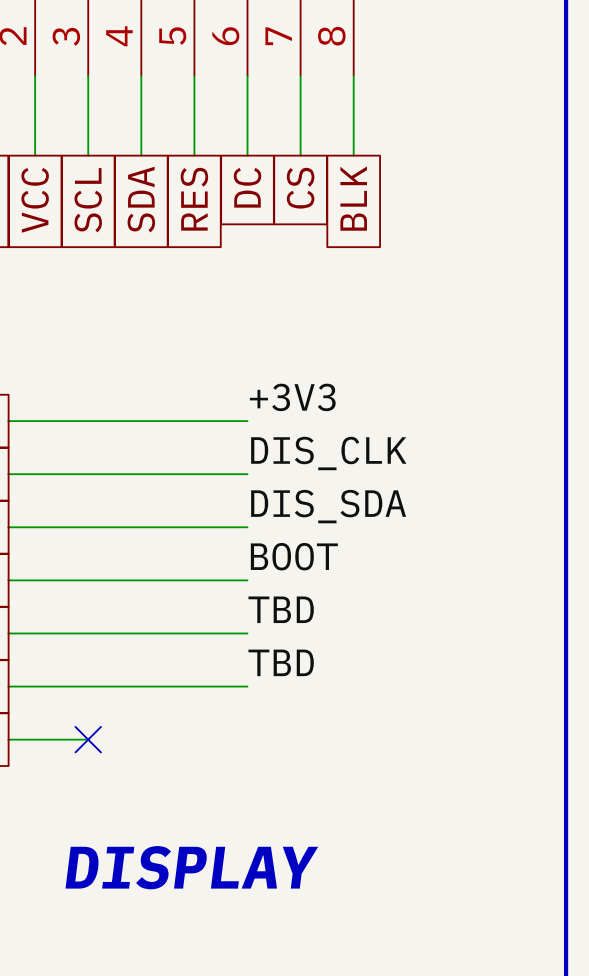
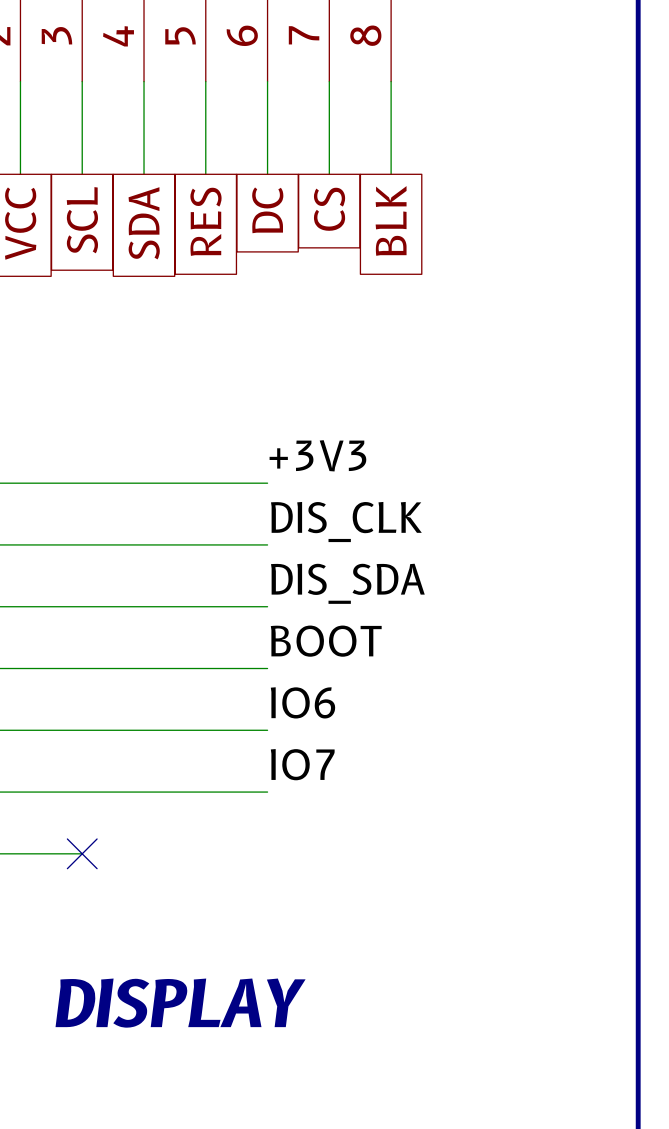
label: TBD (281, 609) -> IO6 (302, 702)
label: TBD (281, 662) -> IO7 (302, 764)

